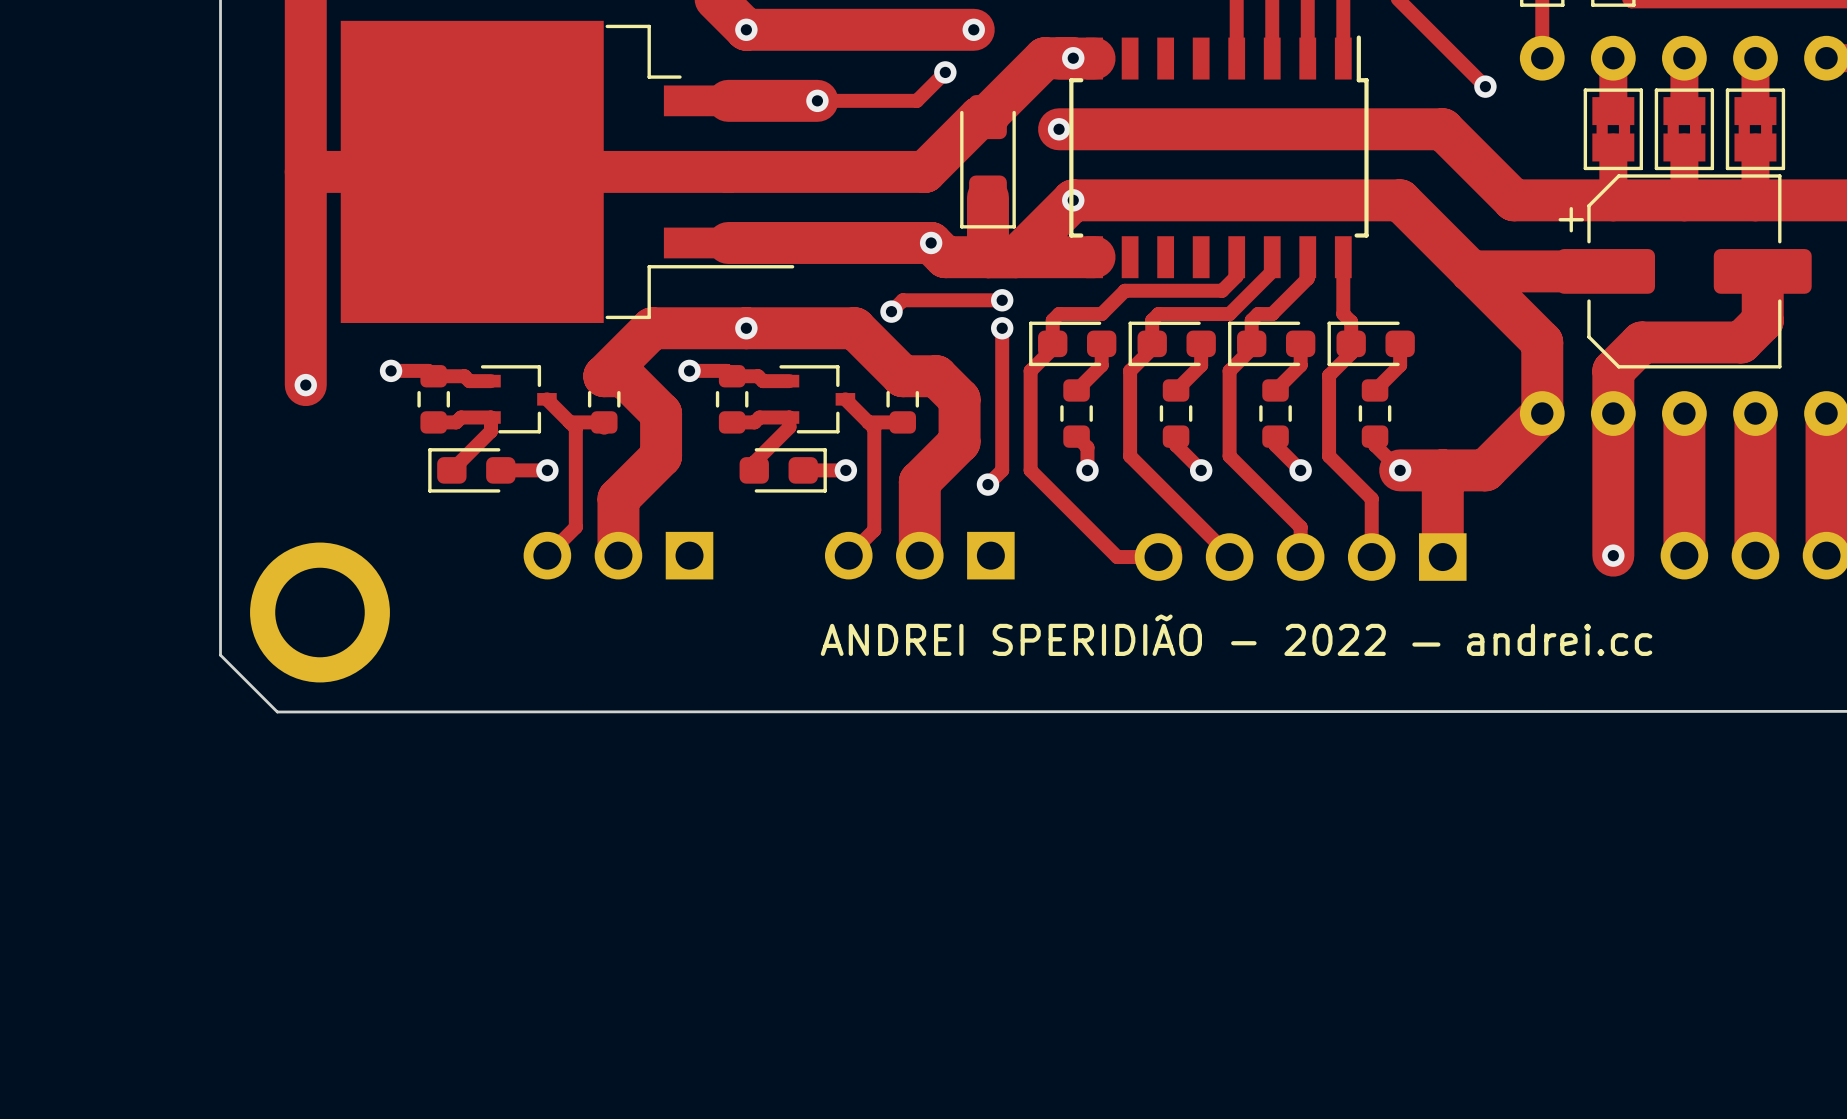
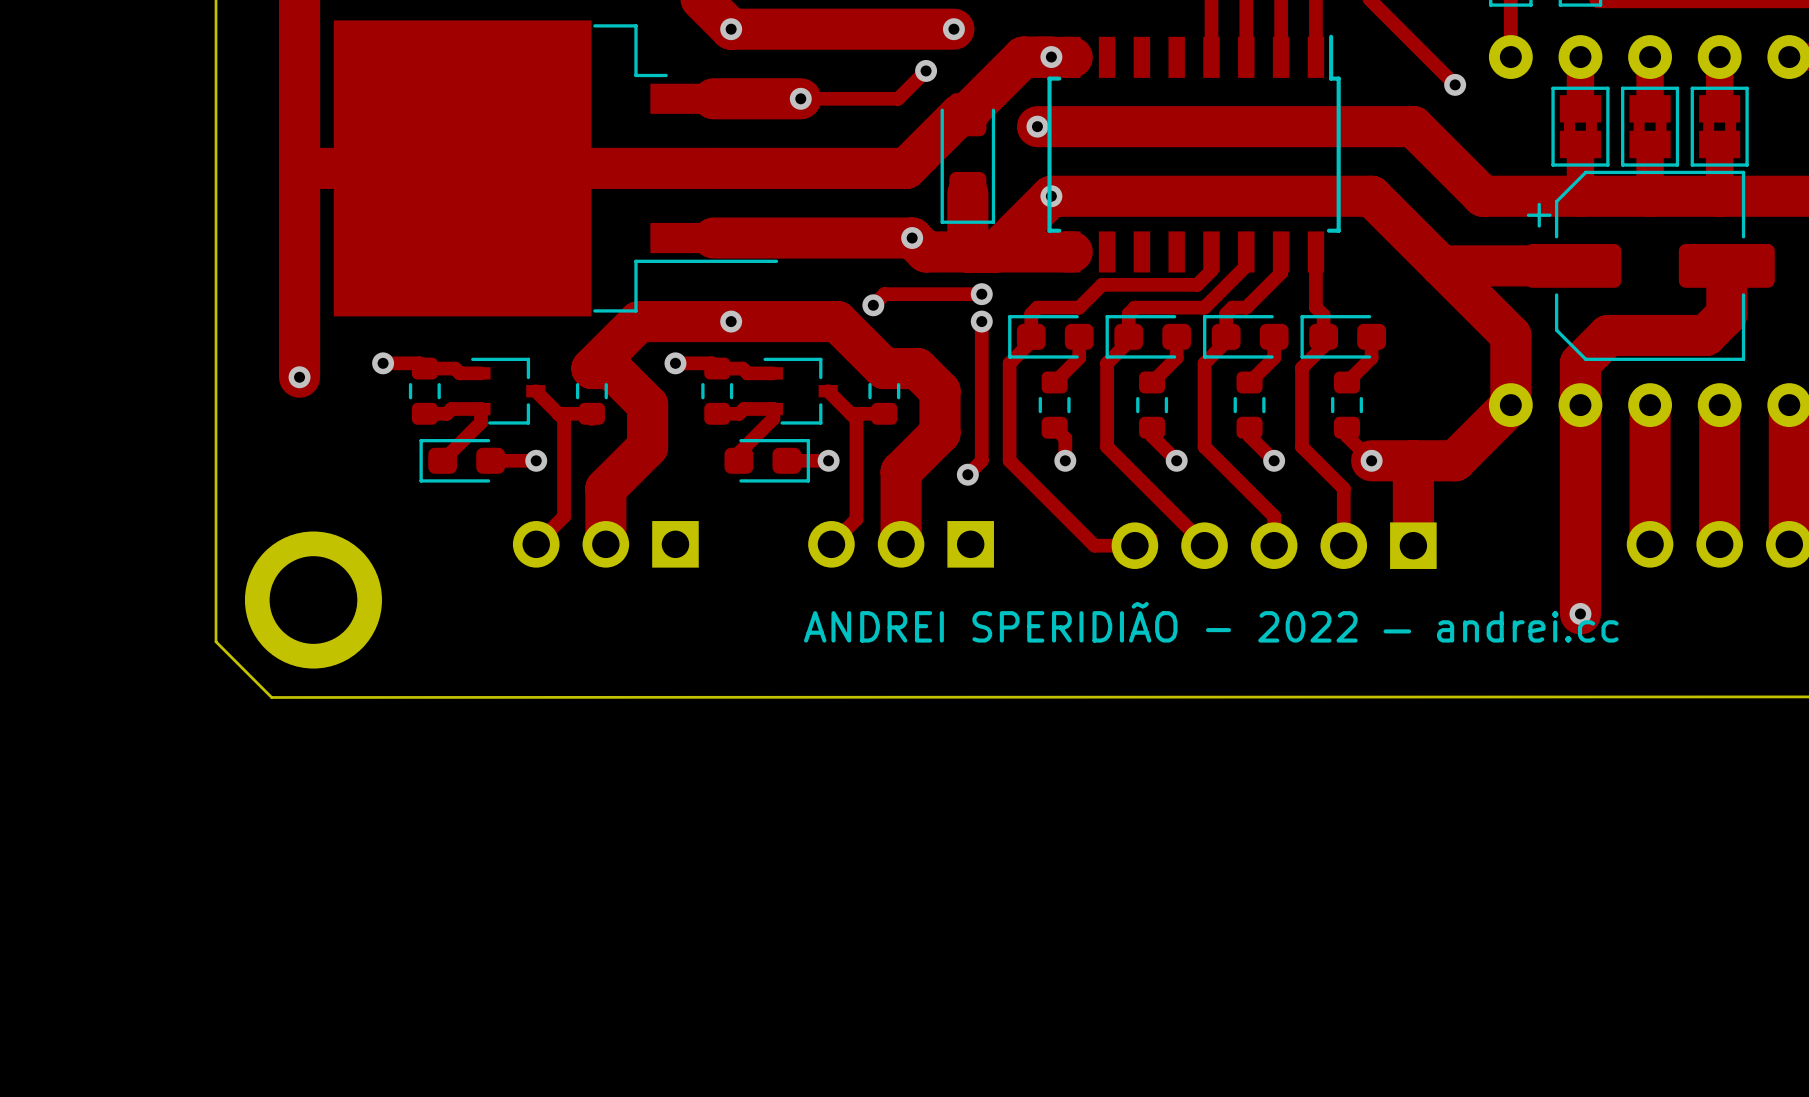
track: none -> (1580, 544) (1580, 613)
via position: (1613, 555) -> (1580, 613)

